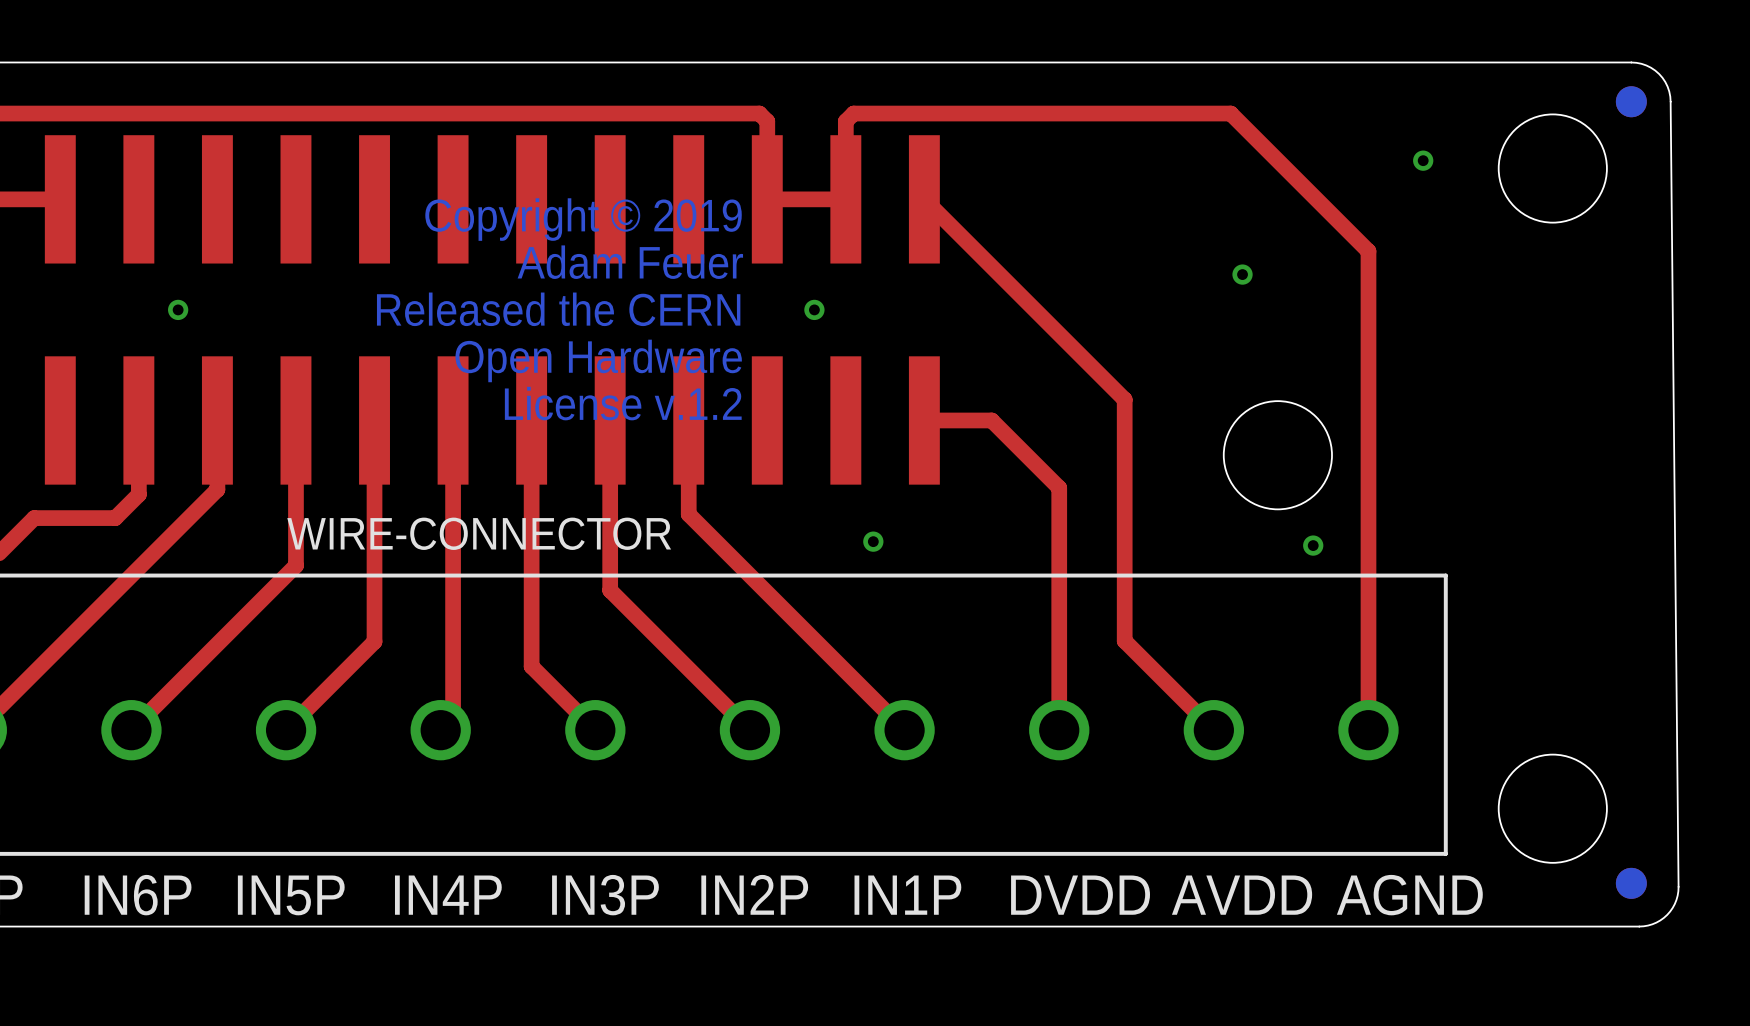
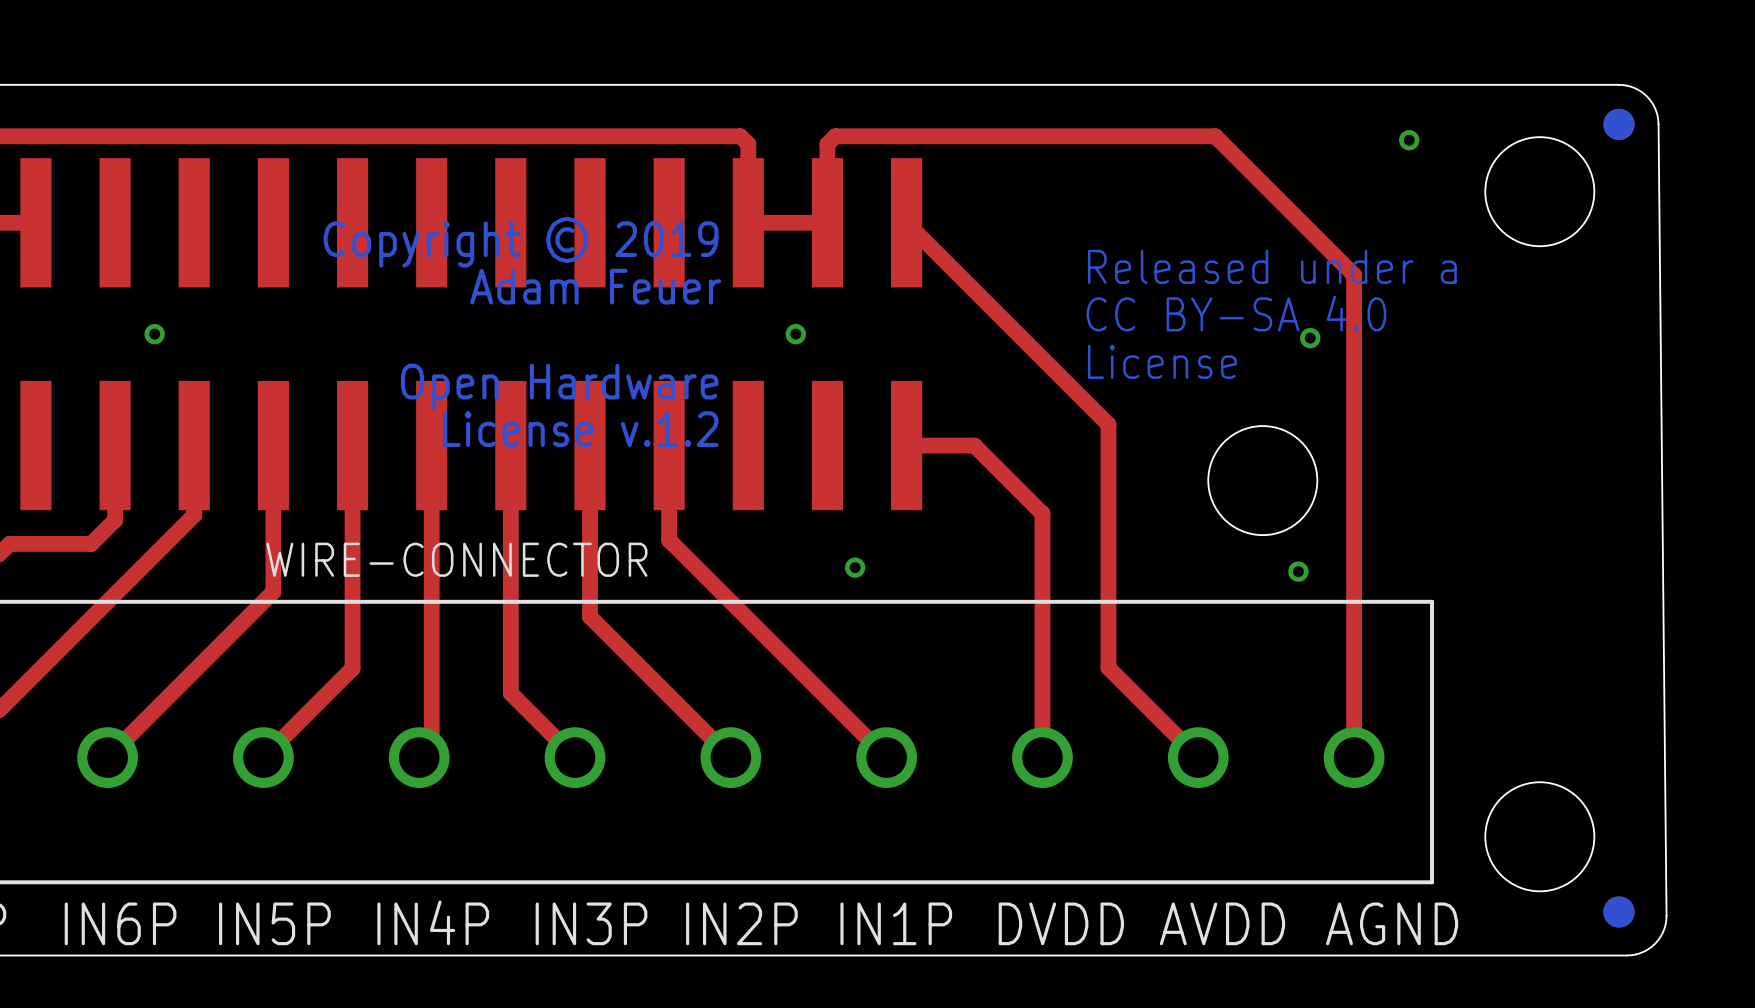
via position: (1423, 160) -> (1409, 140)
text: none -> Released under a (1272, 266)
via: (1242, 274) -> none
text: none -> CC BY-SA 4.0 (1236, 313)
text: Released the CERN (558, 309) -> none
via: none -> (1310, 338)
text: none -> License (1162, 361)

